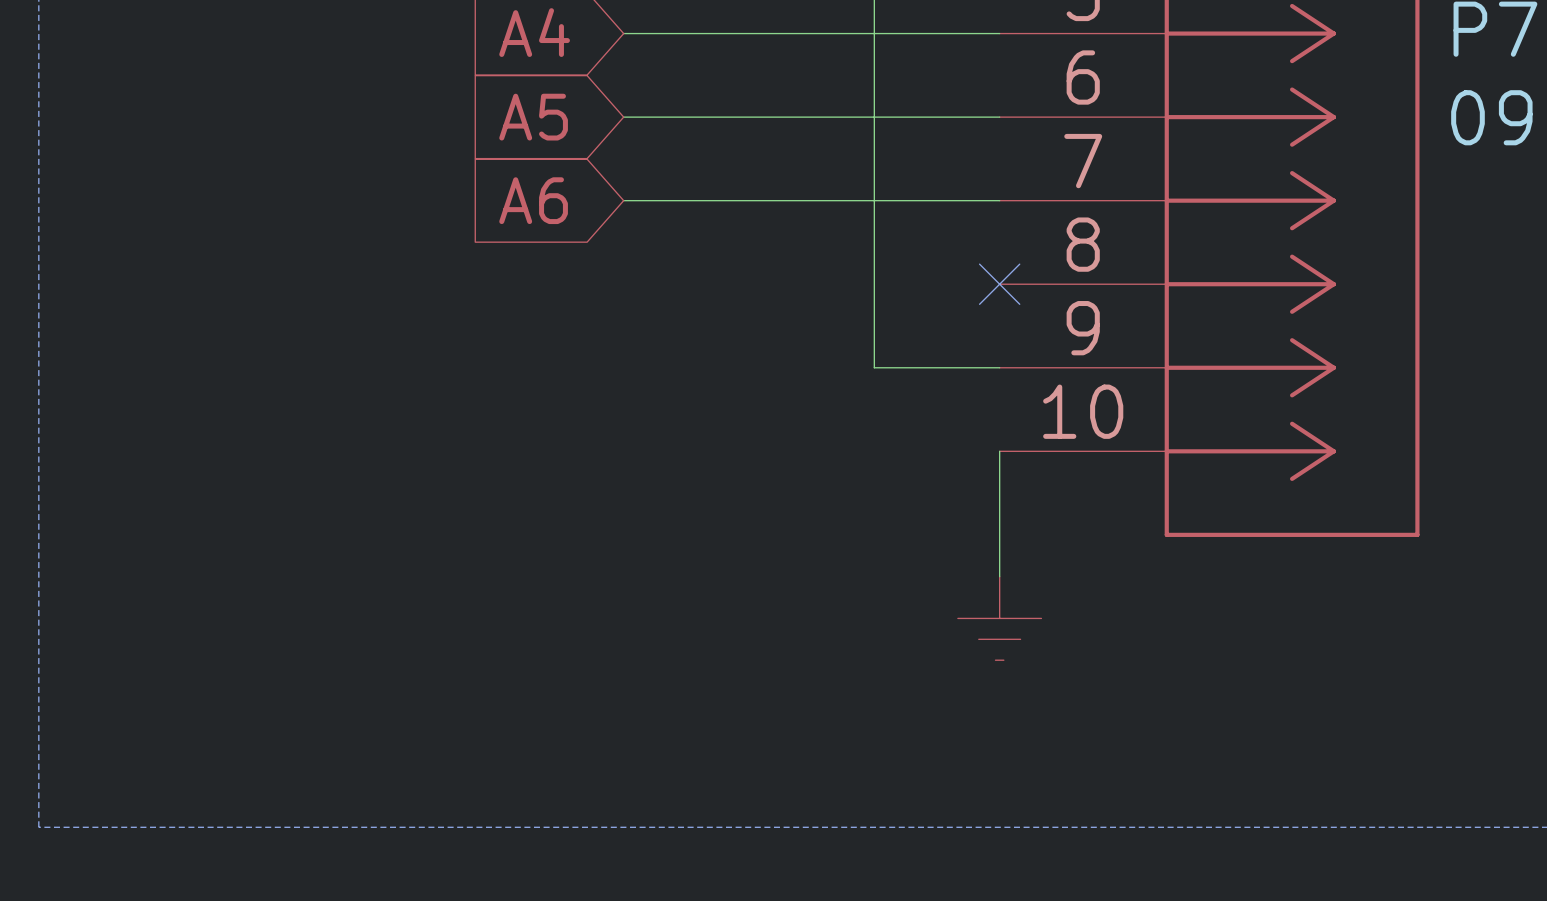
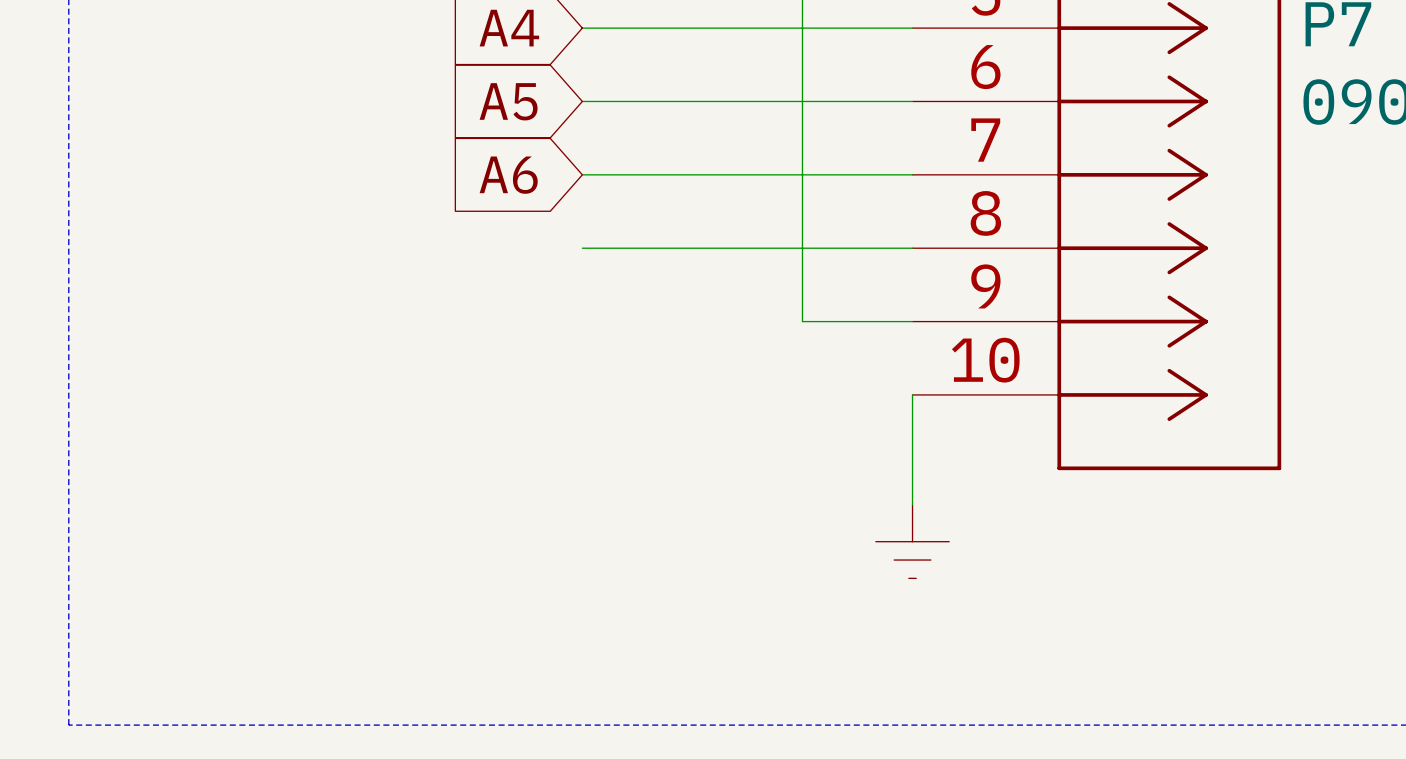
wire: none -> (582, 248) (912, 248)
no-connect mark: (999, 284) -> none

